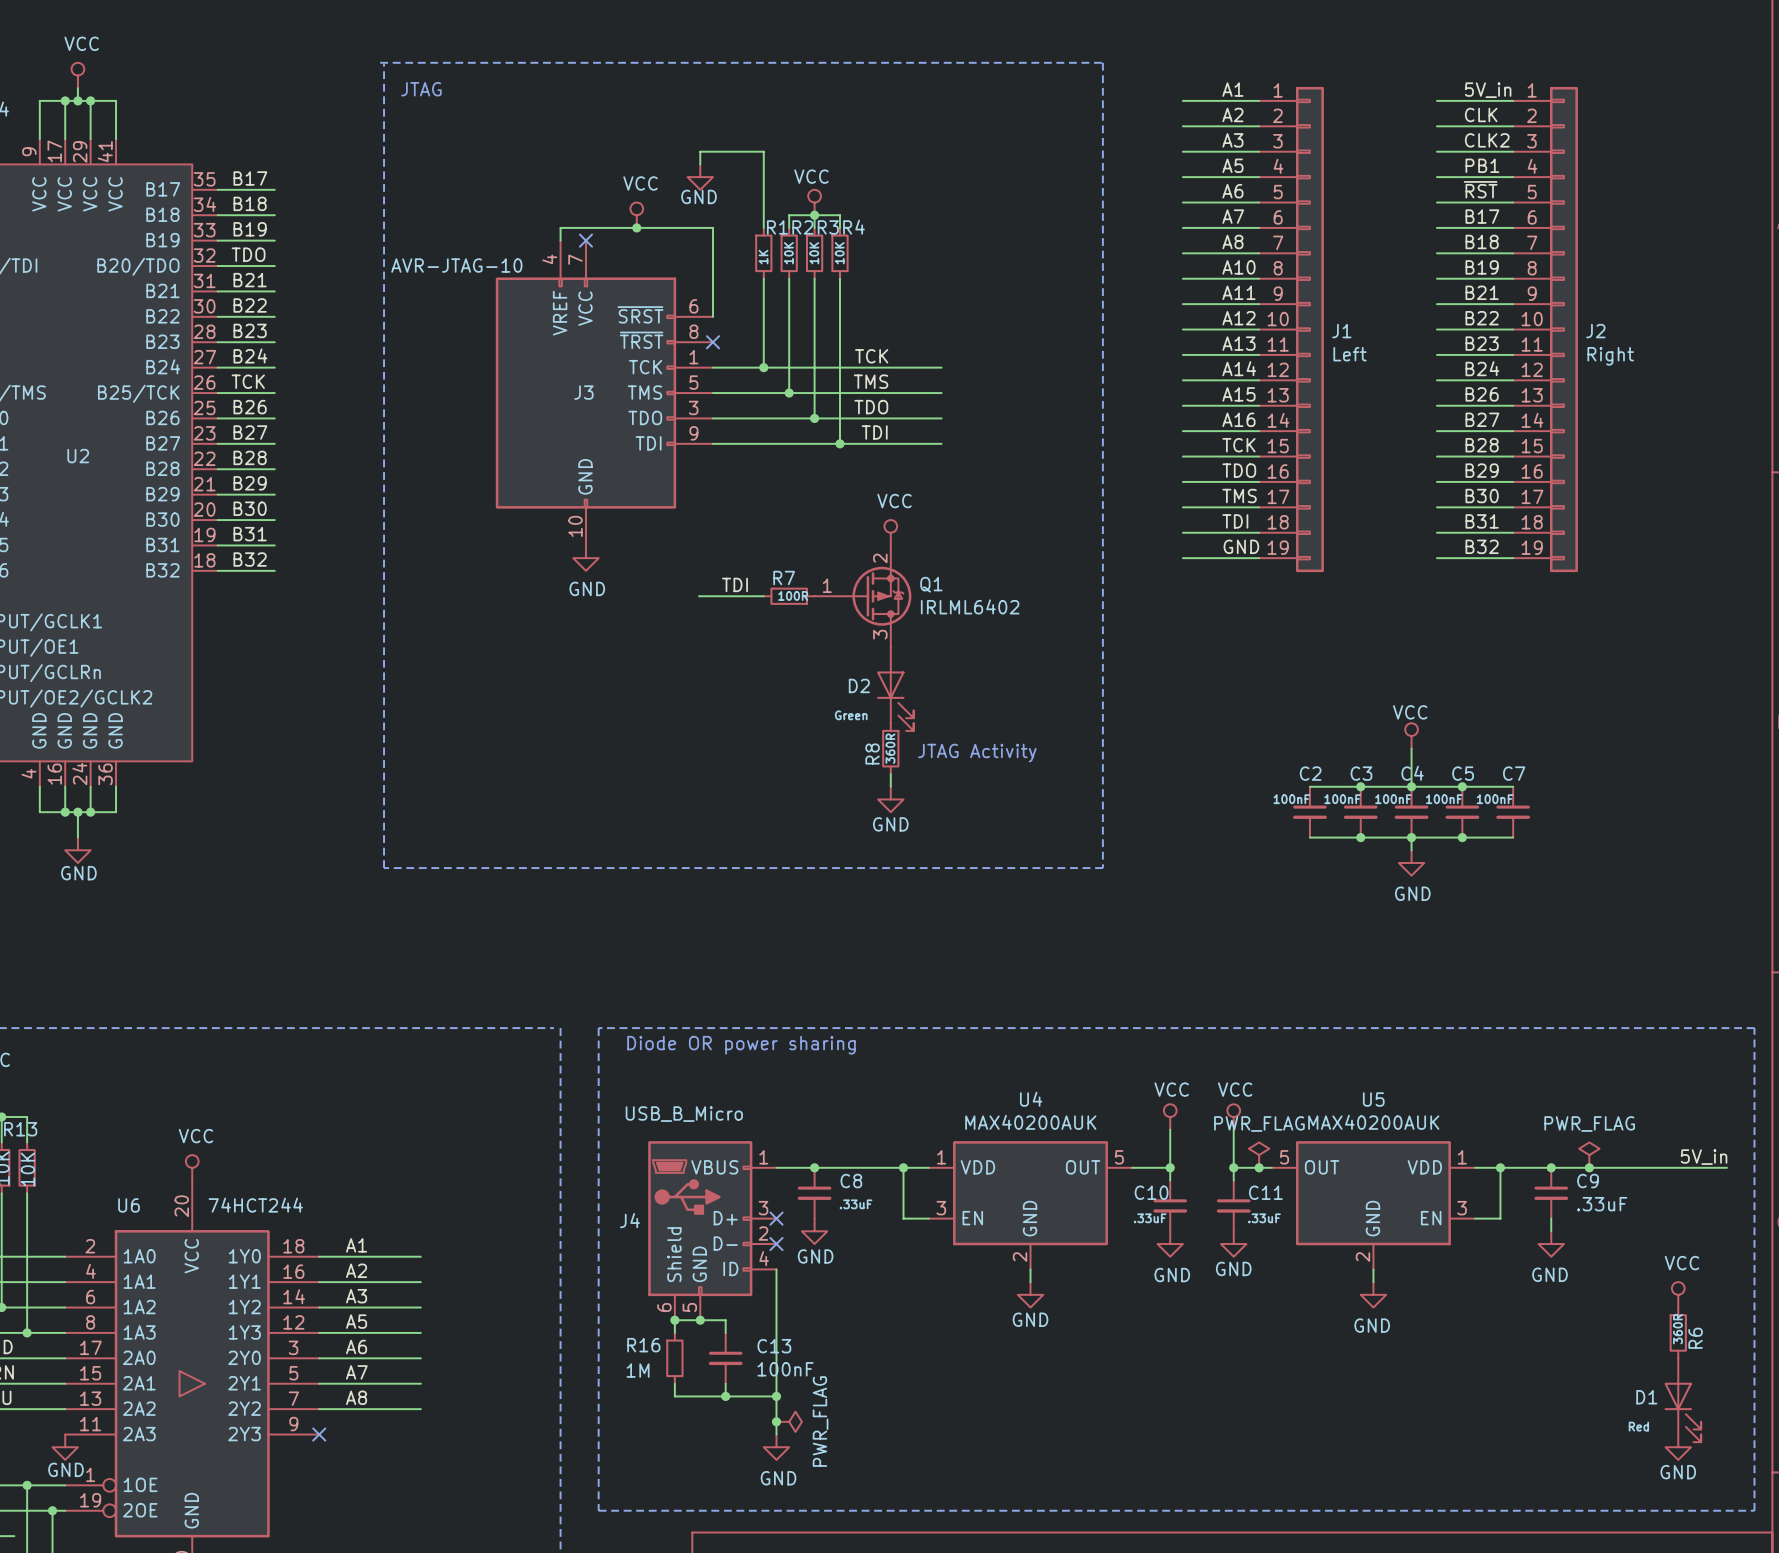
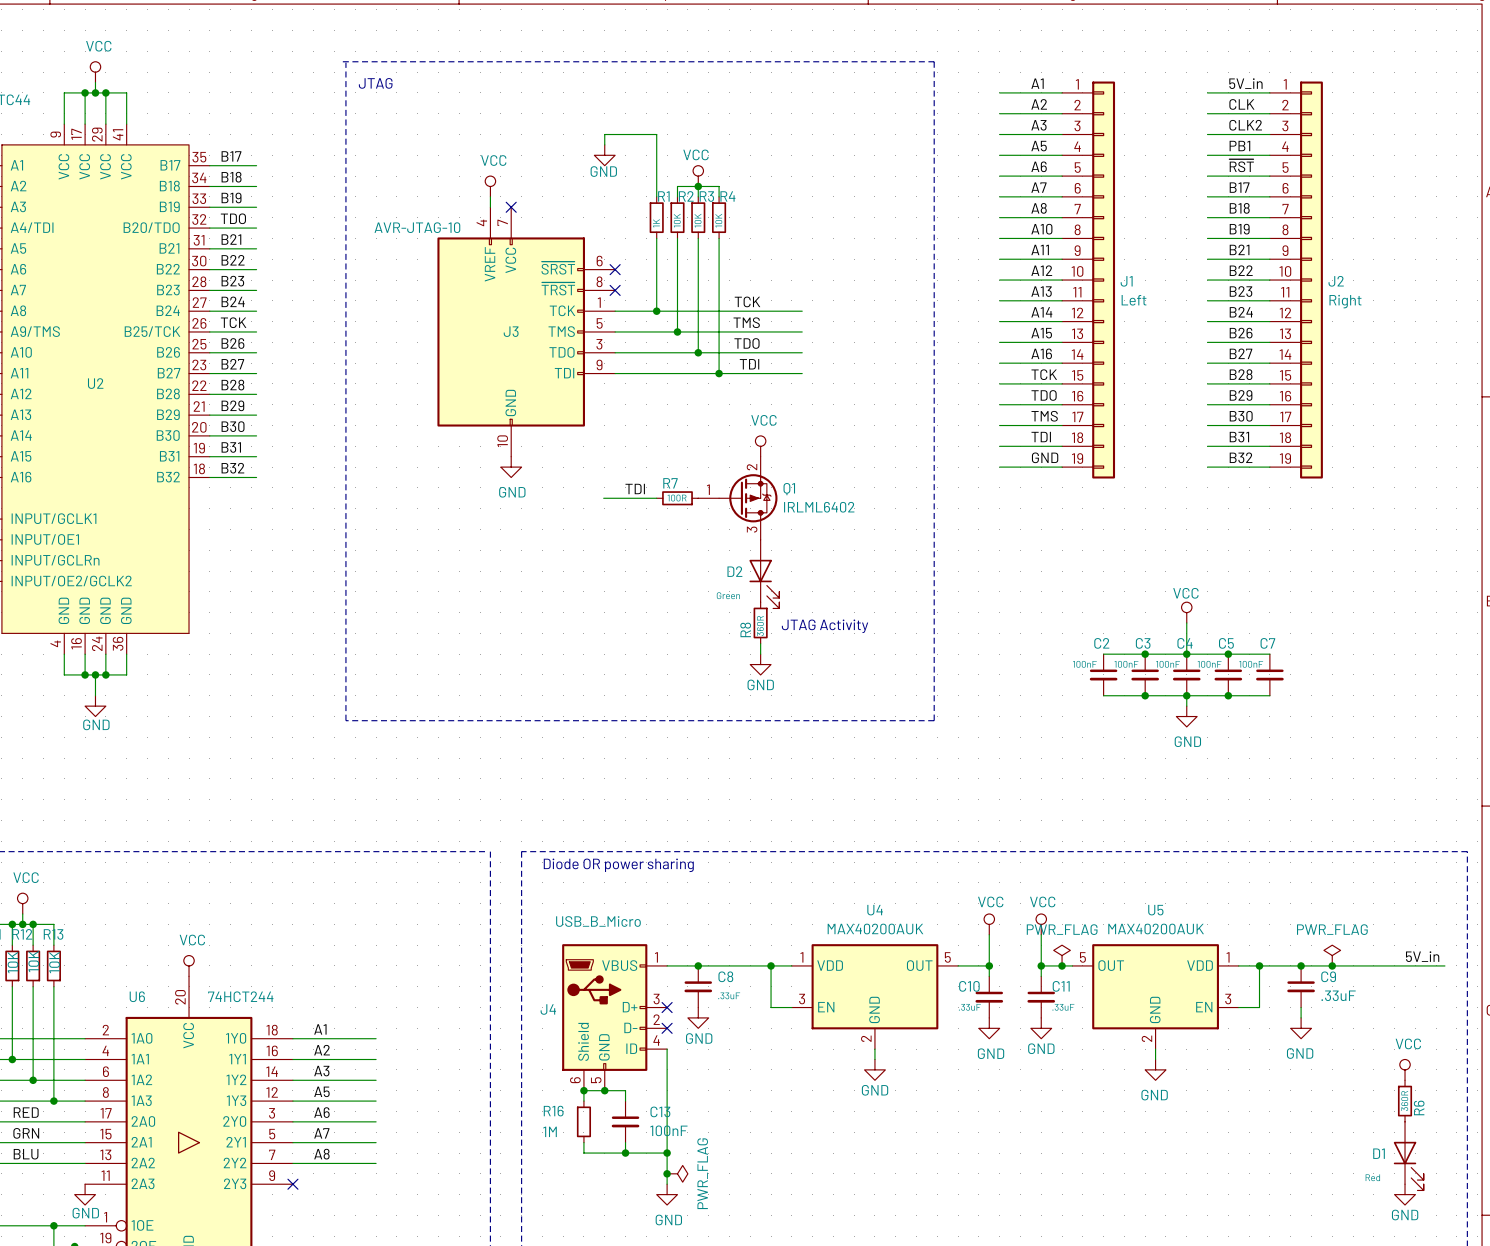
power symbol position: VCC (636, 215) -> VCC (490, 186)
wire: (560, 227) (712, 227) (712, 316) -> none
junction: (636, 227) -> none
no-connect mark: none -> (615, 269)

